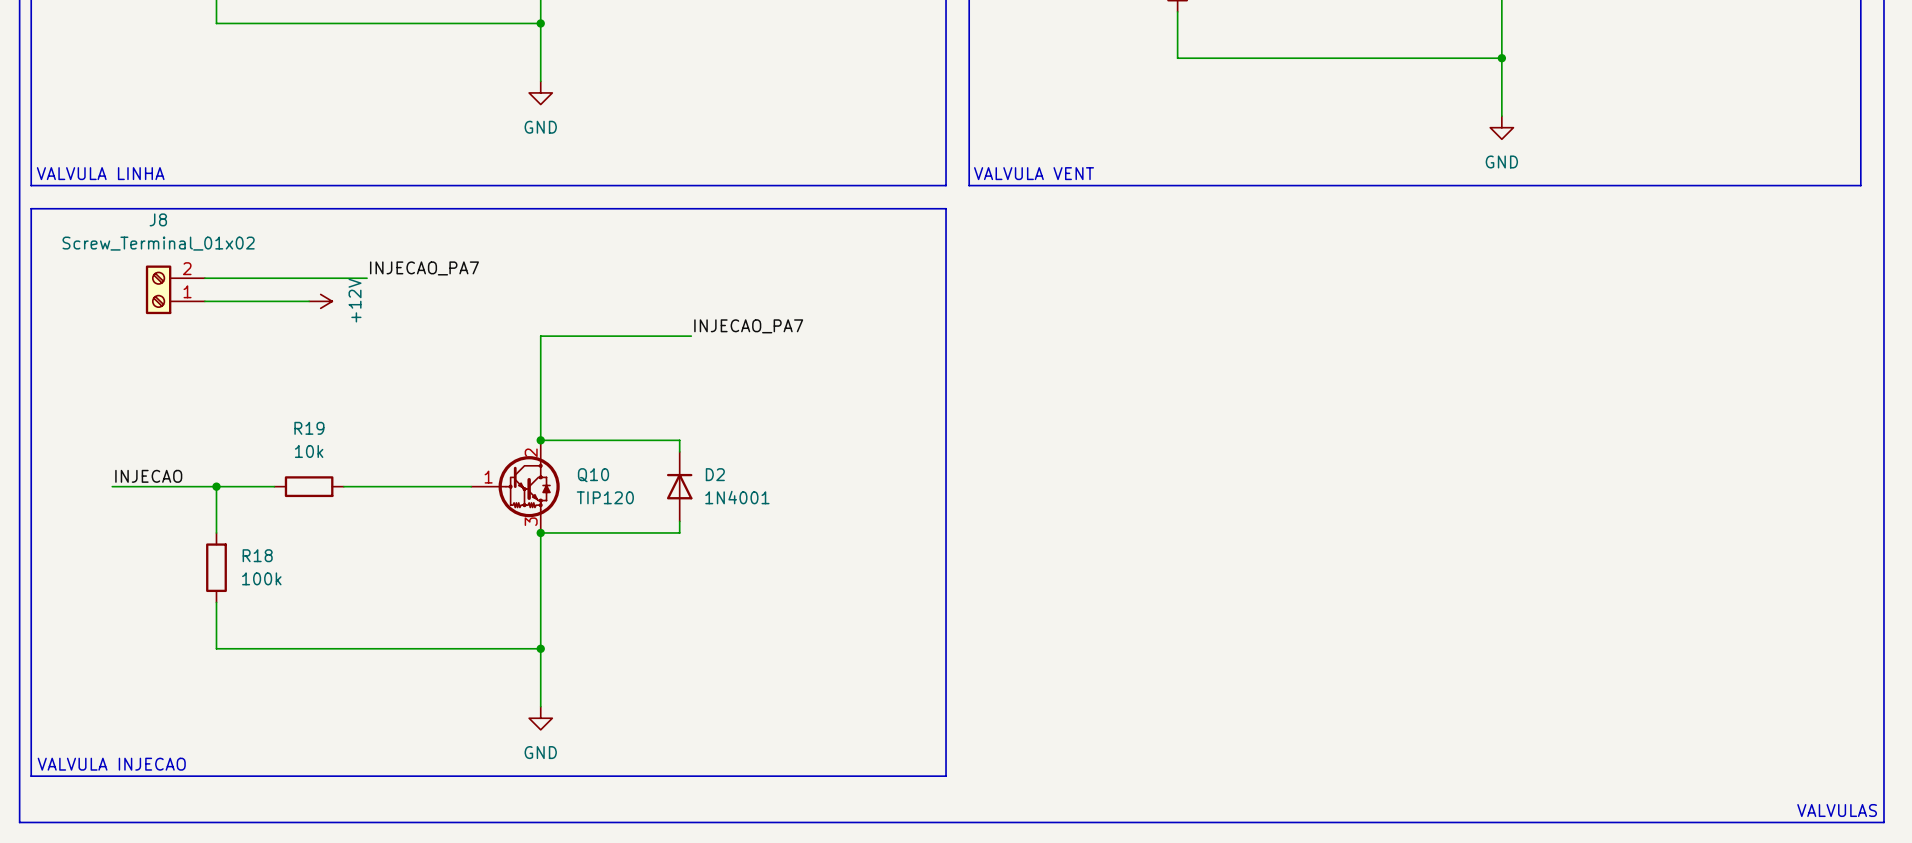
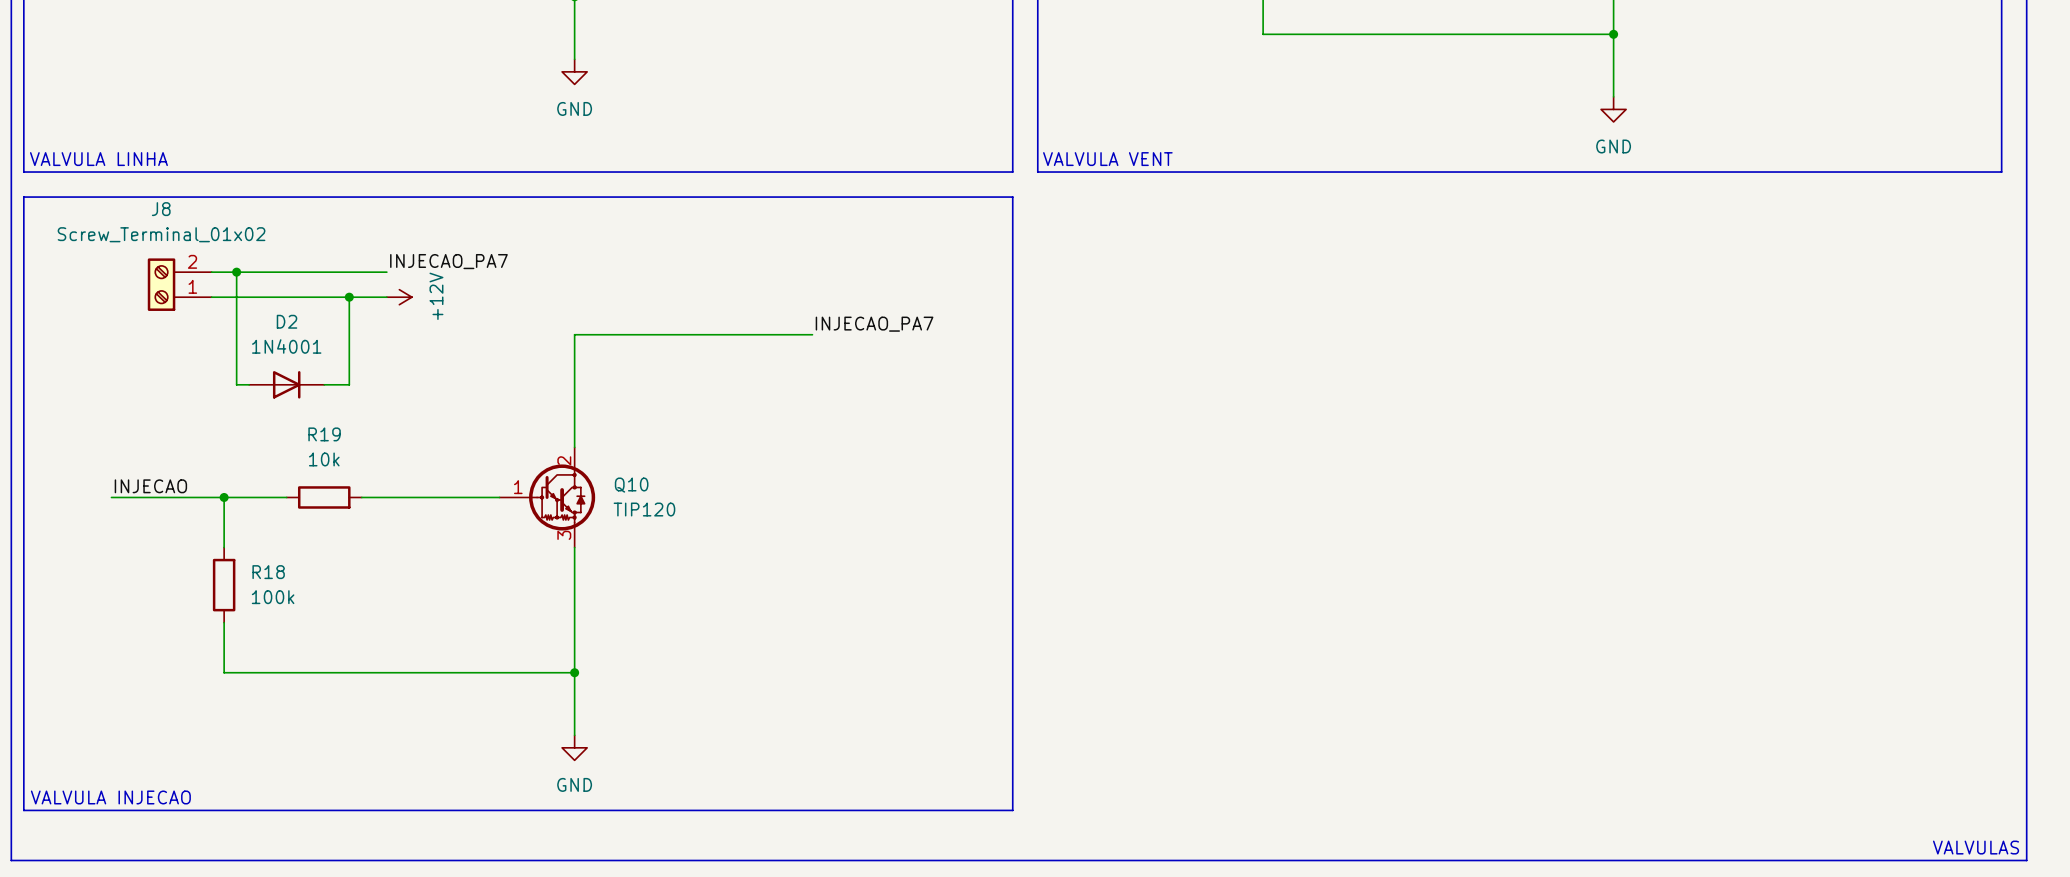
wire: none -> (236, 272) (236, 384) (249, 384)
junction: none -> (236, 272)
wire: none -> (324, 297) (386, 297)
power symbol position: +12V (320, 301) -> +12V (399, 297)
wire: none -> (349, 297) (349, 384) (324, 384)
junction: none -> (349, 297)
label position: INJECAO_PA7 (748, 326) -> INJECAO_PA7 (874, 324)
wire: none -> (737, 334) (812, 334)
wire: (540, 440) (679, 440) (679, 451) -> none
junction: (540, 440) -> none
D2 name position: D2 (715, 474) -> D2 (287, 321)
D2 rotation: 0° (679, 486) -> 90° clockwise (286, 384)
D2 position: (679, 486) -> (286, 384)
D2 value position: 1N4001 (737, 497) -> 1N4001 (286, 346)
wire: (679, 521) (679, 532) (540, 532) -> none
junction: (540, 532) -> none

